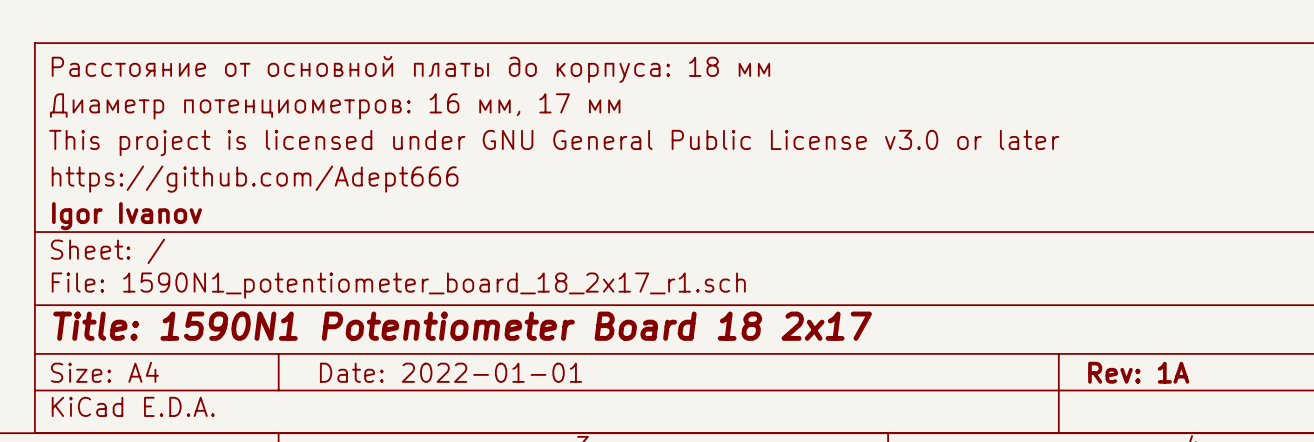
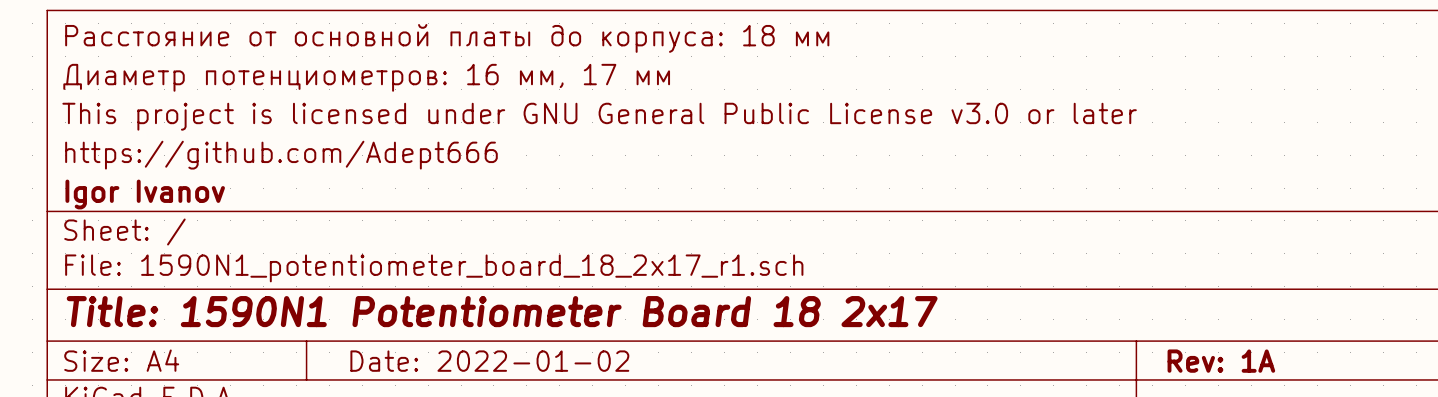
title block: Date: 2022-01-01 (451, 372) -> Date: 2022-01-02 (489, 361)

